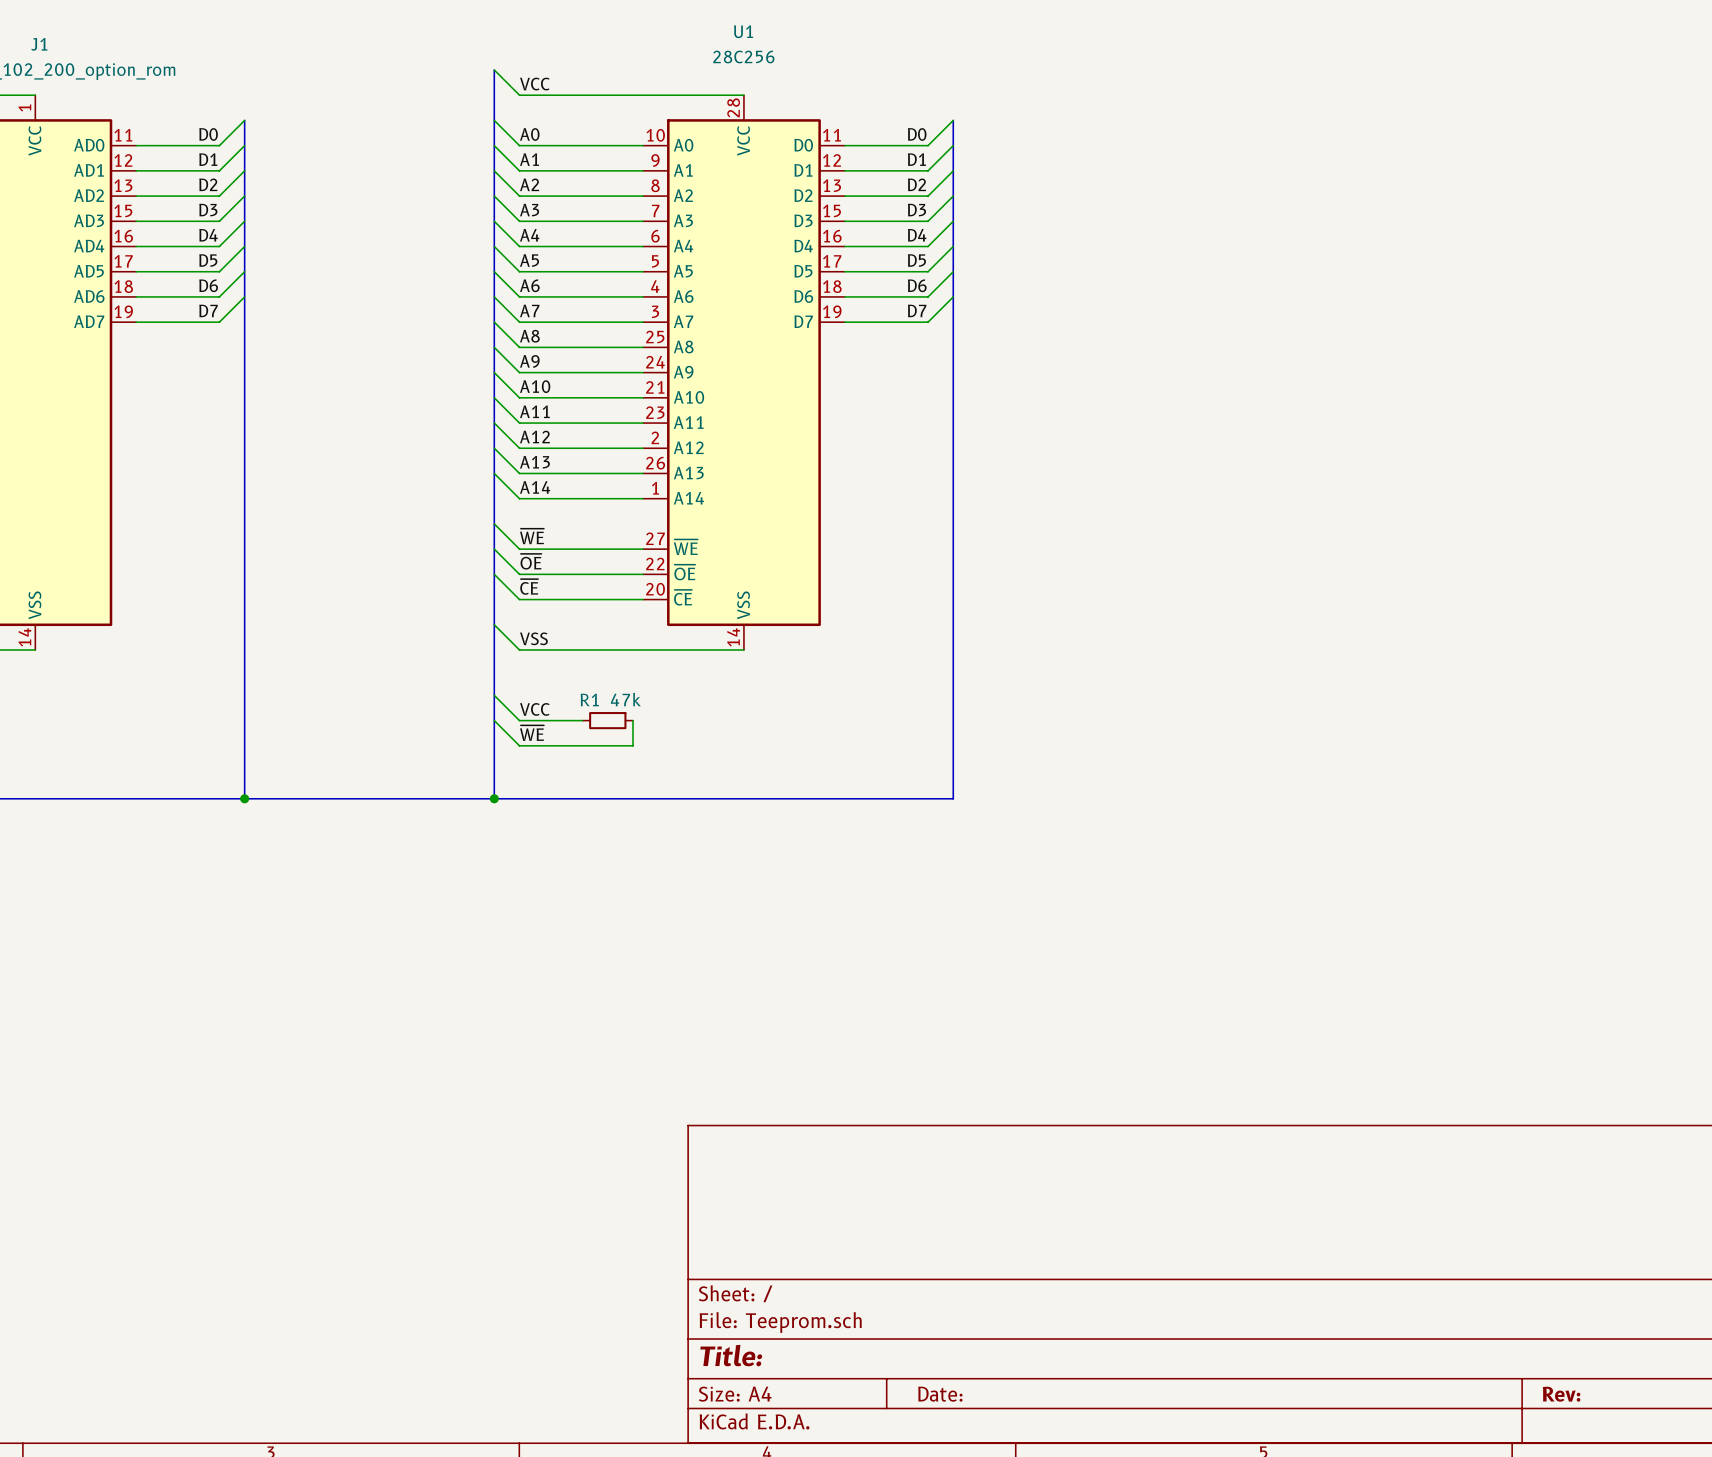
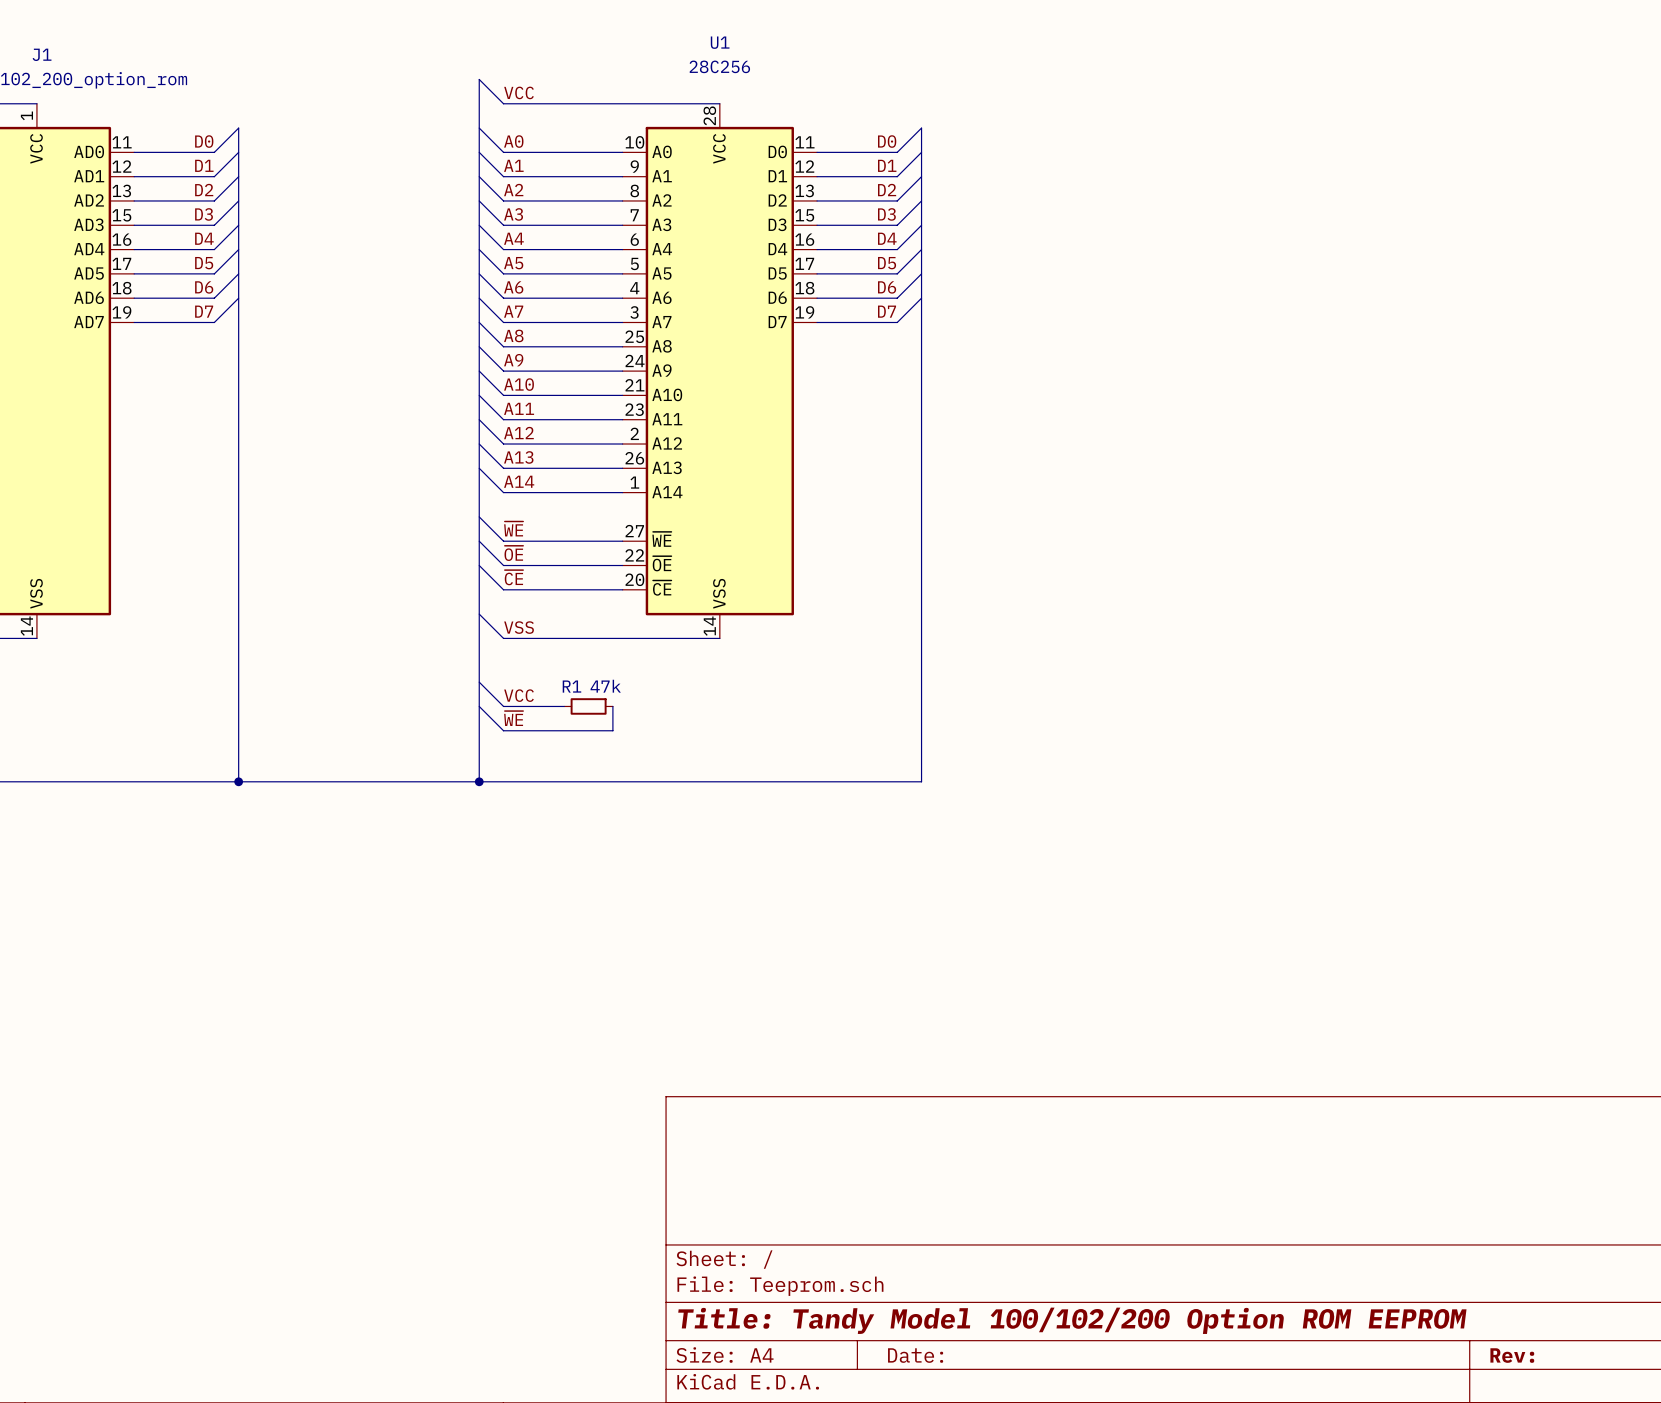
title block: Title: (731, 1355) -> Title: Tandy Model 100/102/200 Option ROM EEPROM (1072, 1320)

